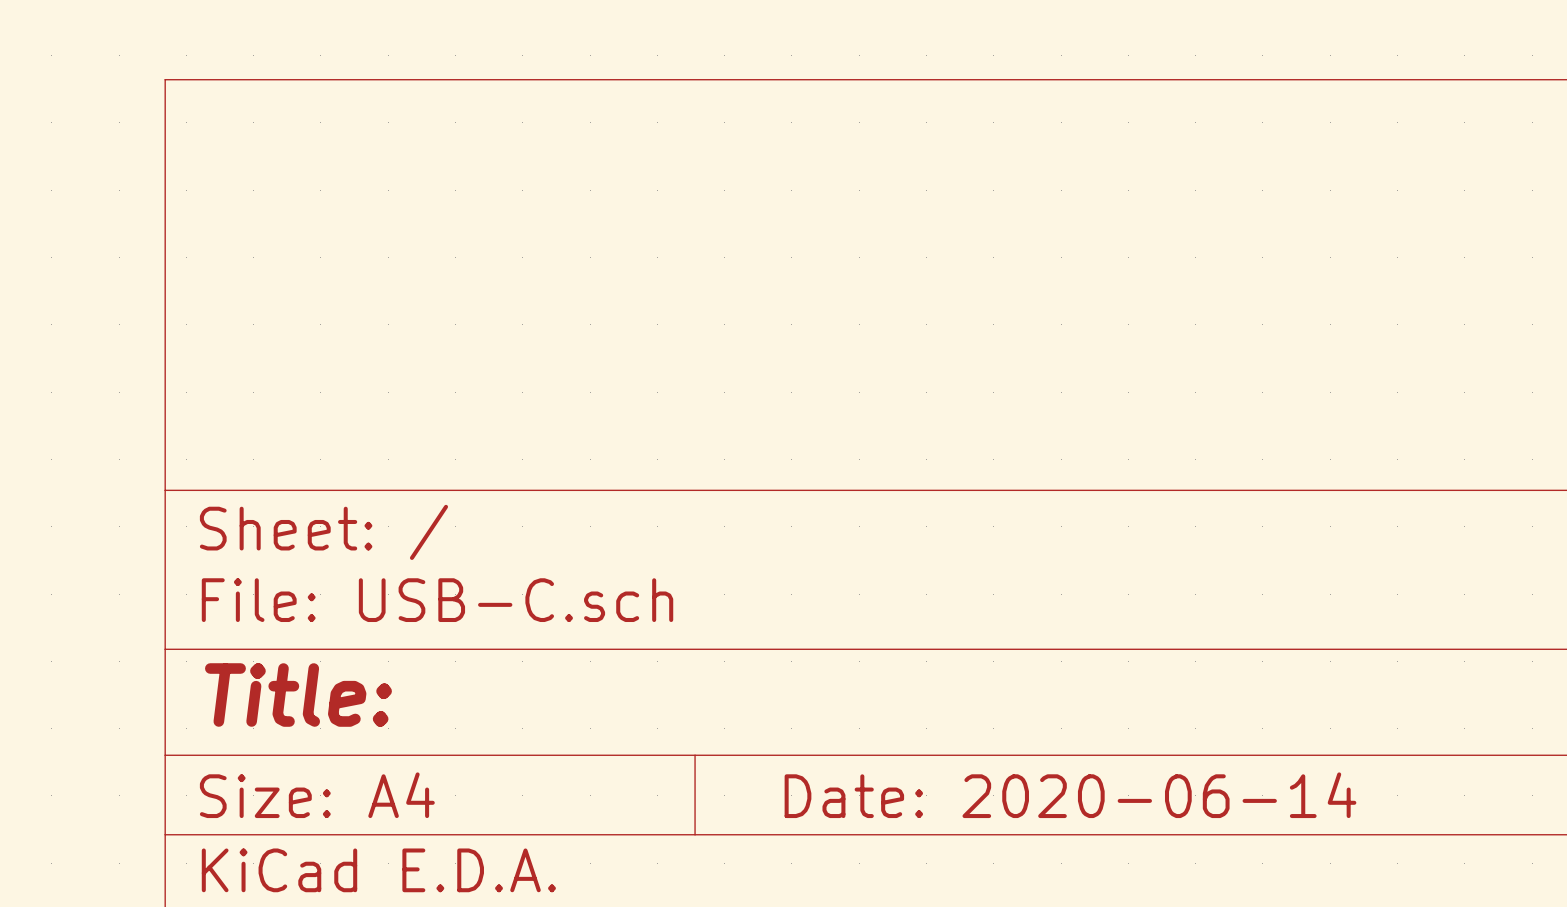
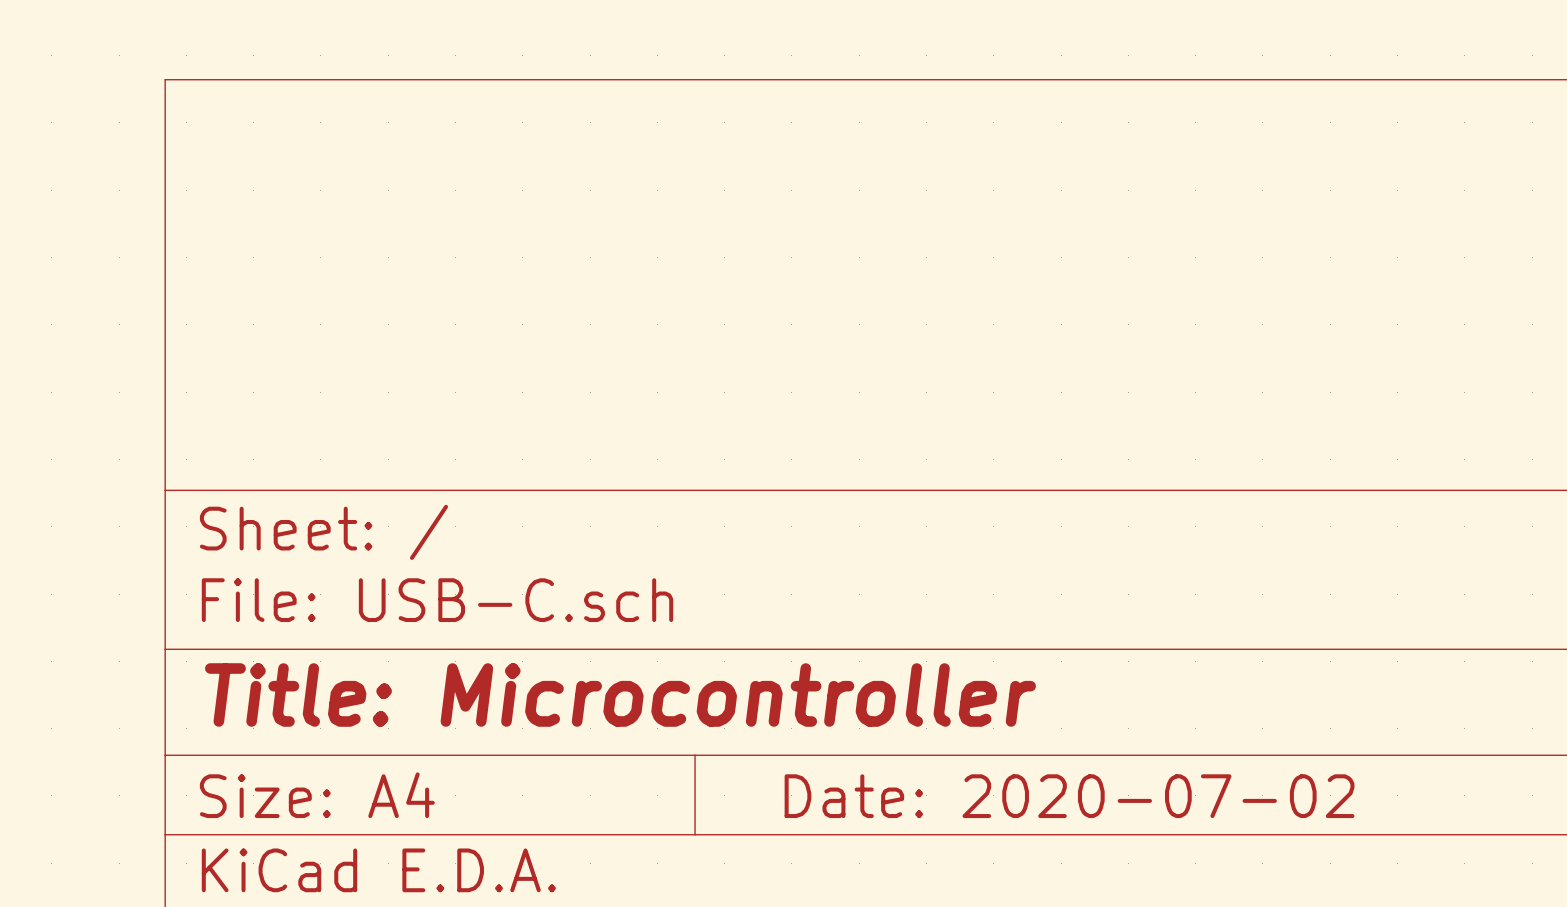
title block: Title: (298, 695) -> Title: Microcontroller (620, 695)
title block: Date: 2020-06-14 (1070, 795) -> Date: 2020-07-02 (1069, 796)

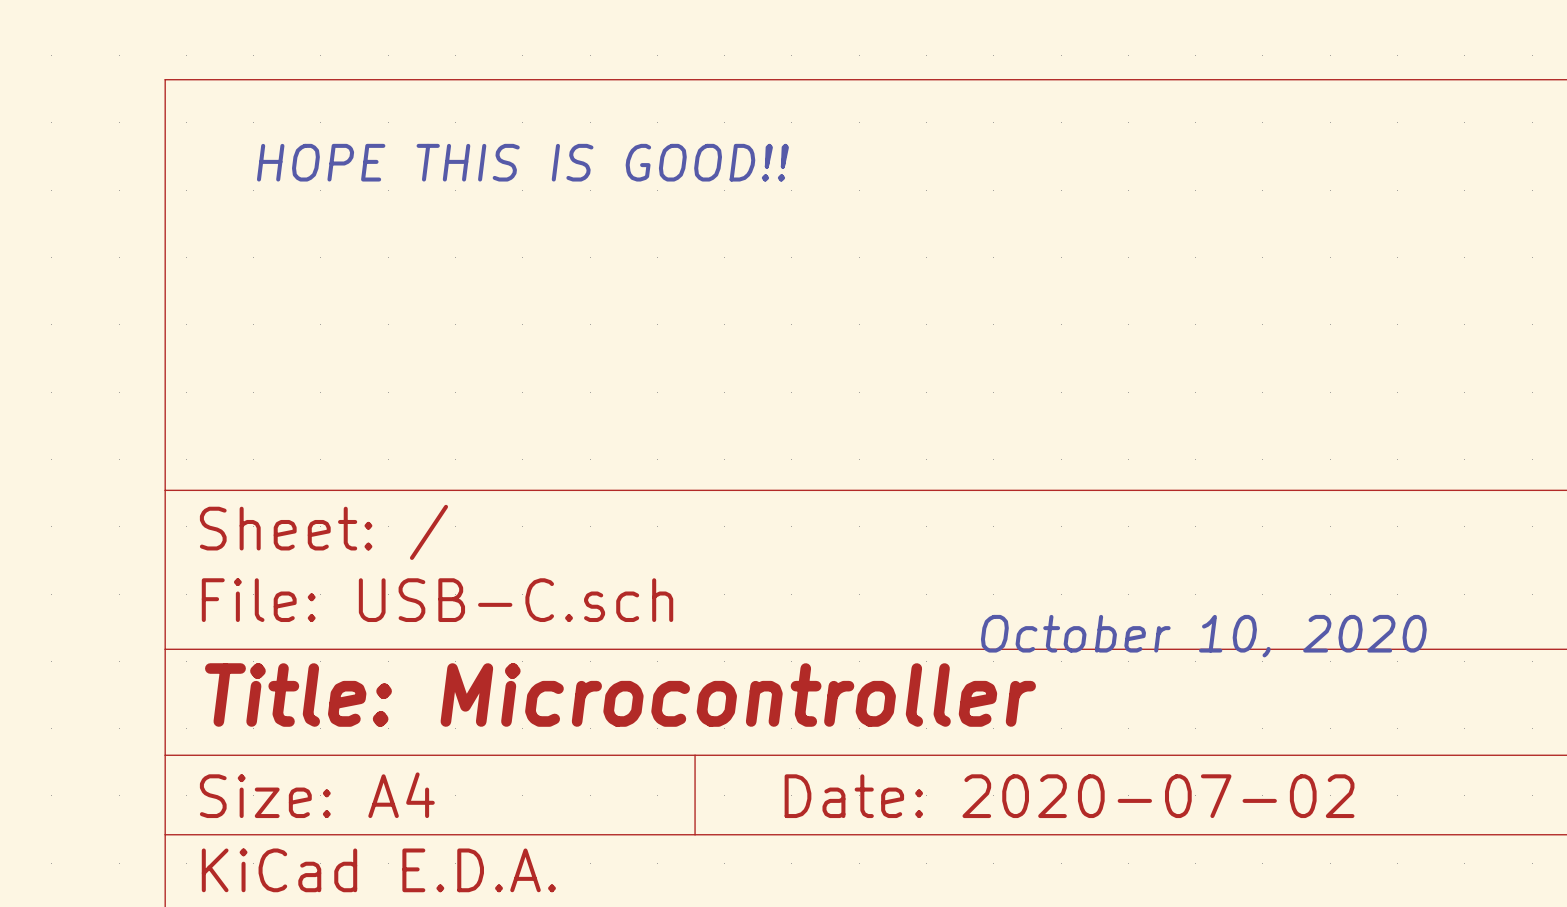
text: none -> HOPE THIS IS GOOD!! (522, 162)
text: none -> October 10, 2020 (1203, 636)

